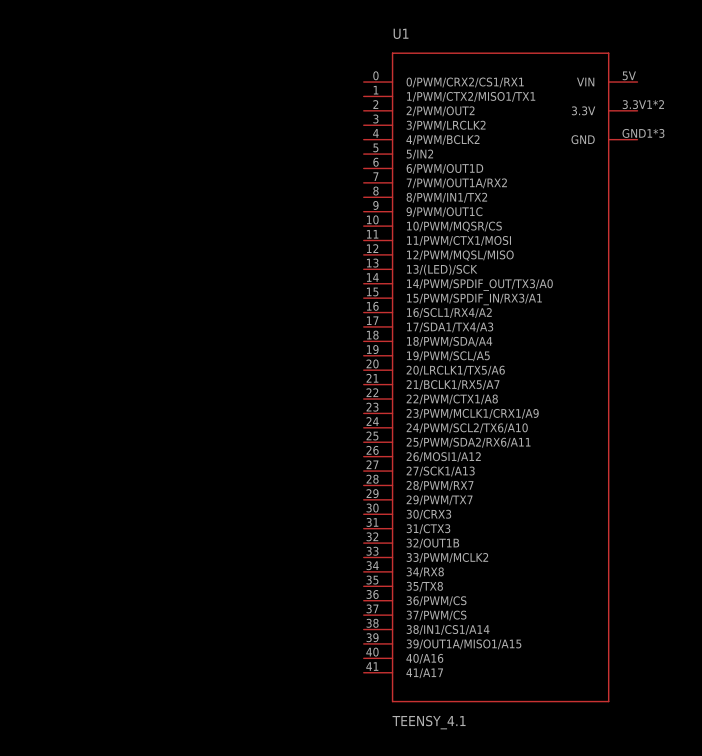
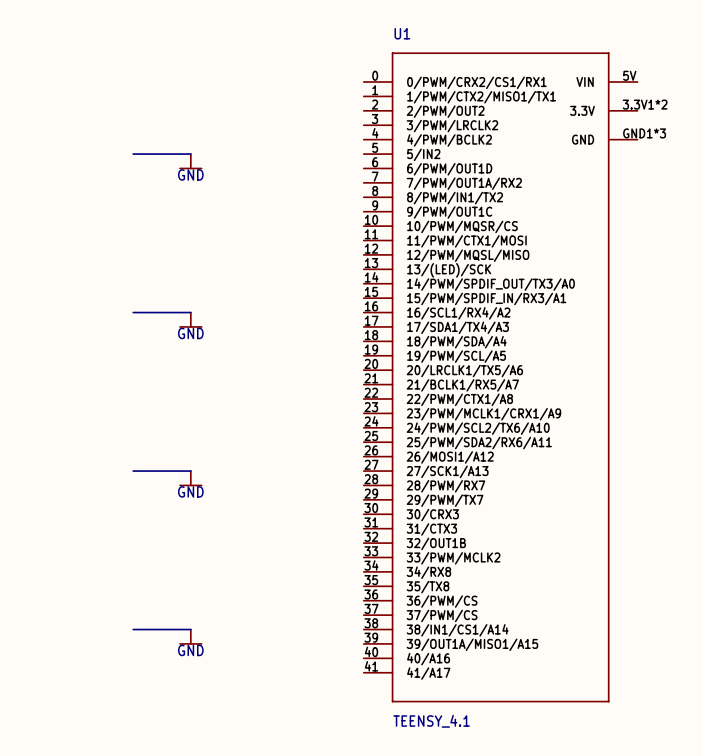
wire: none -> (133, 154) (190, 154)
power symbol: none -> GND (190, 161)
wire: none -> (133, 312) (190, 312)
power symbol: none -> GND (190, 320)
wire: none -> (133, 471) (190, 471)
power symbol: none -> GND (190, 478)
wire: none -> (133, 629) (190, 629)
power symbol: none -> GND (190, 637)

